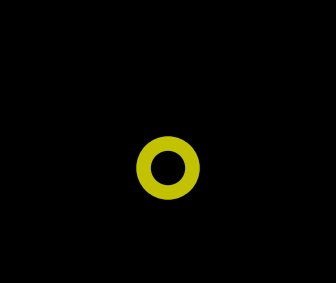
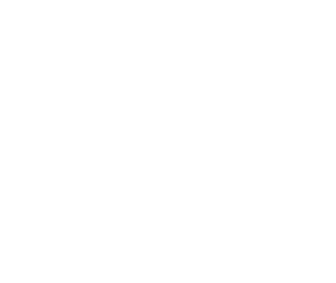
part: (168, 168) -> none

